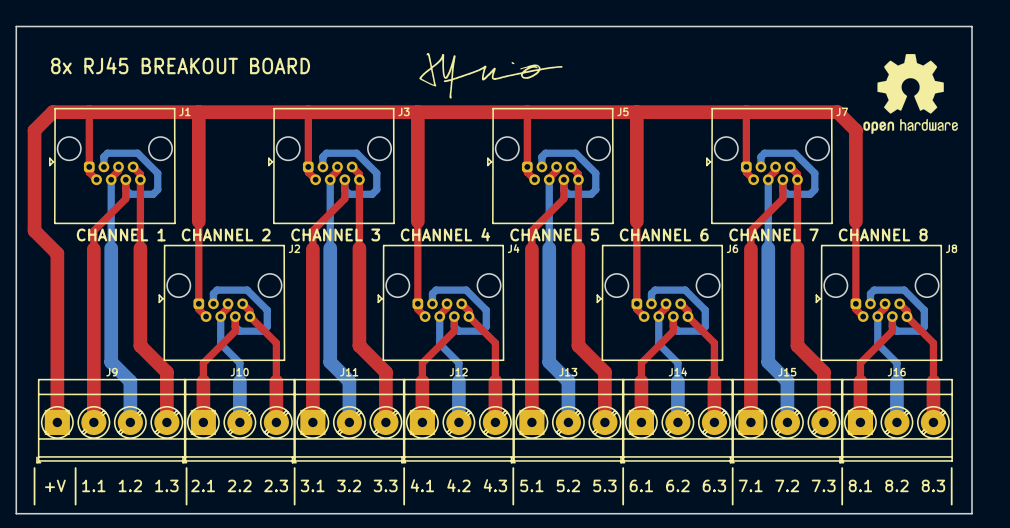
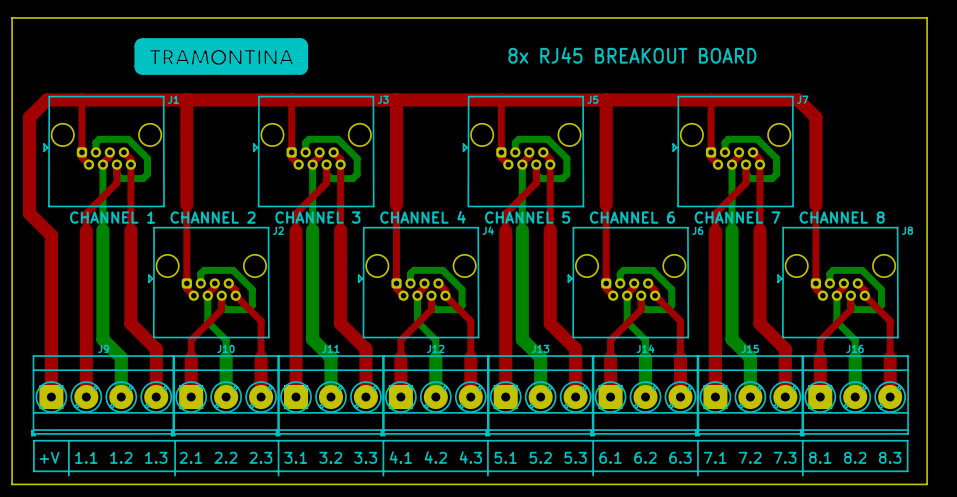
drawing: none -> [135, 38, 308, 75]
drawing: [419, 52, 563, 99] -> none
drawing: [863, 54, 958, 135] -> none
text: 8x RJ45 BREAKOUT BOARD (180, 65) -> none
text: none -> 8x RJ45 BREAKOUT BOARD (632, 55)
line: (34, 468) (34, 504) -> none
line: (951, 500) (951, 504) -> (907, 471) (33, 471) (33, 440) (907, 440)

